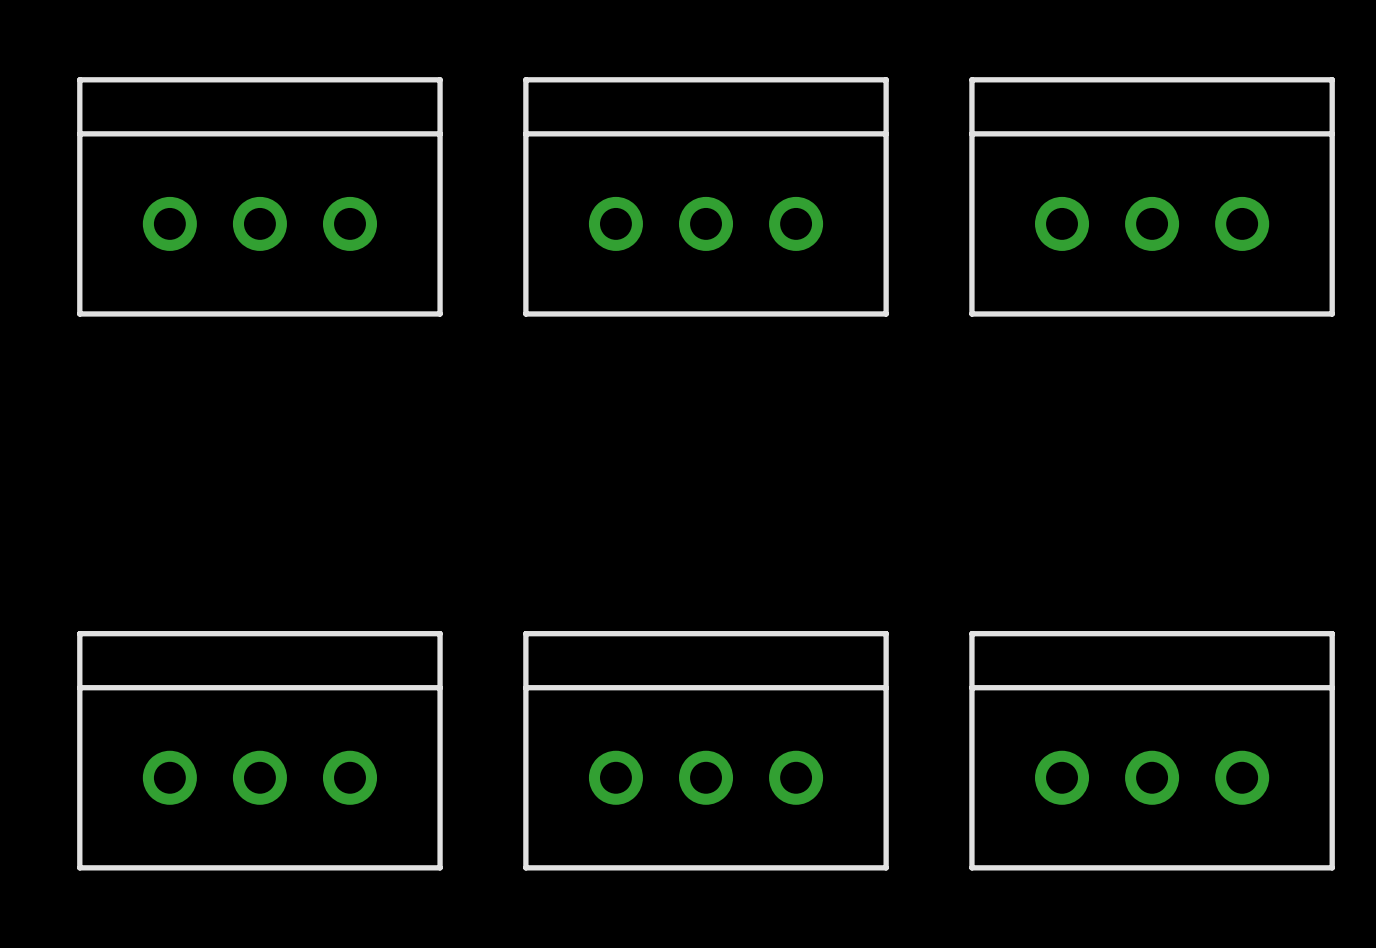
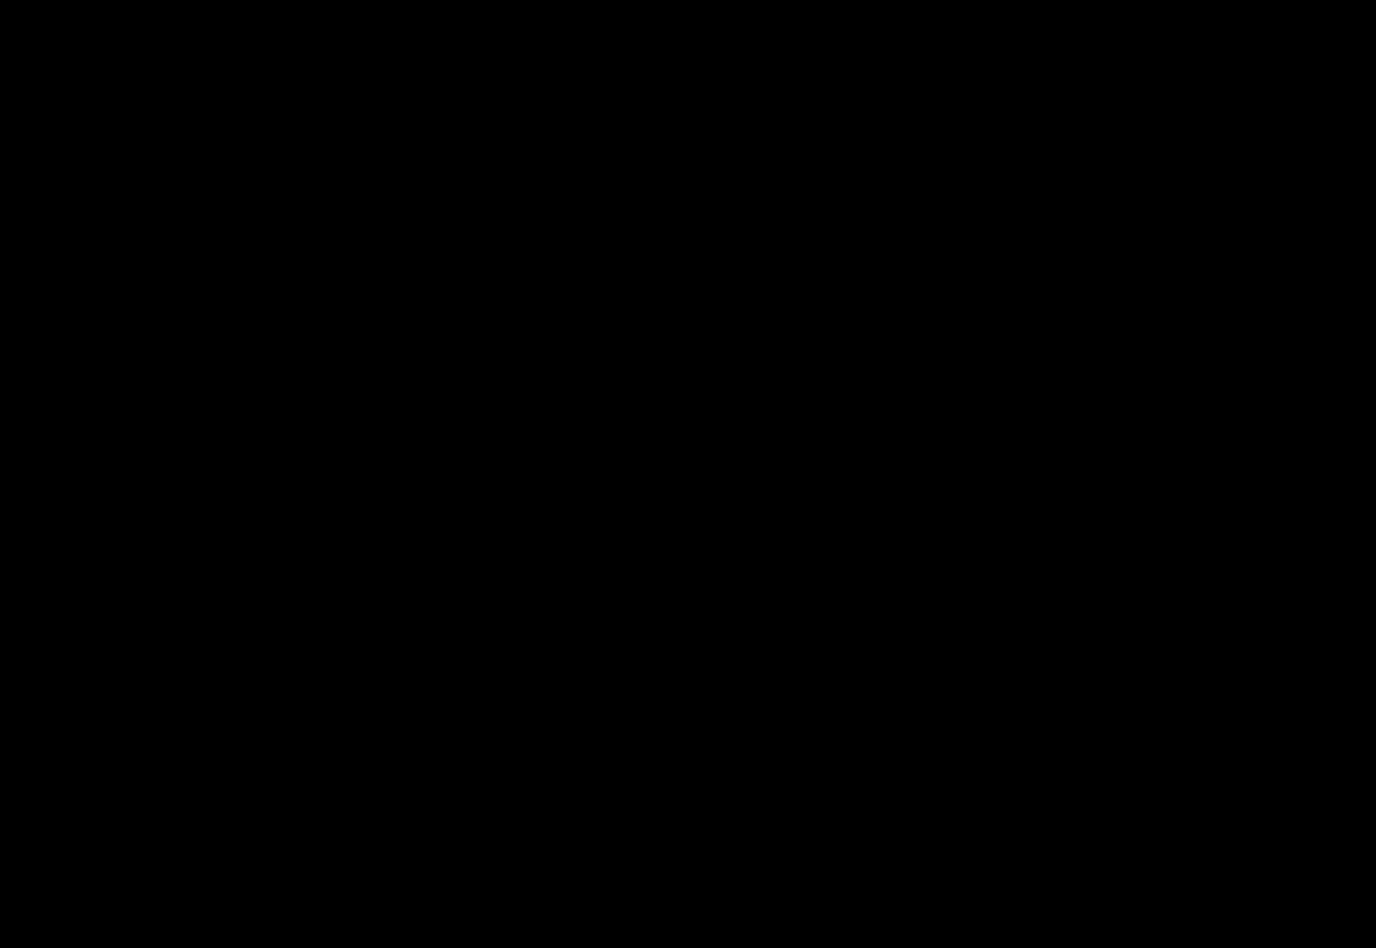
part: (259, 196) -> none
part: (706, 196) -> none
part: (1152, 196) -> none
part: (259, 750) -> none
part: (706, 750) -> none
part: (1152, 750) -> none

